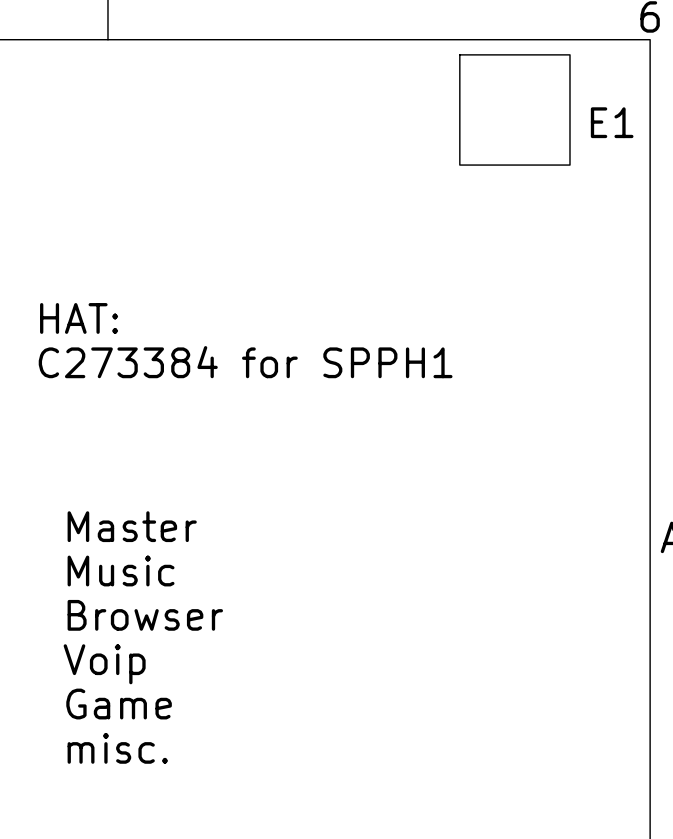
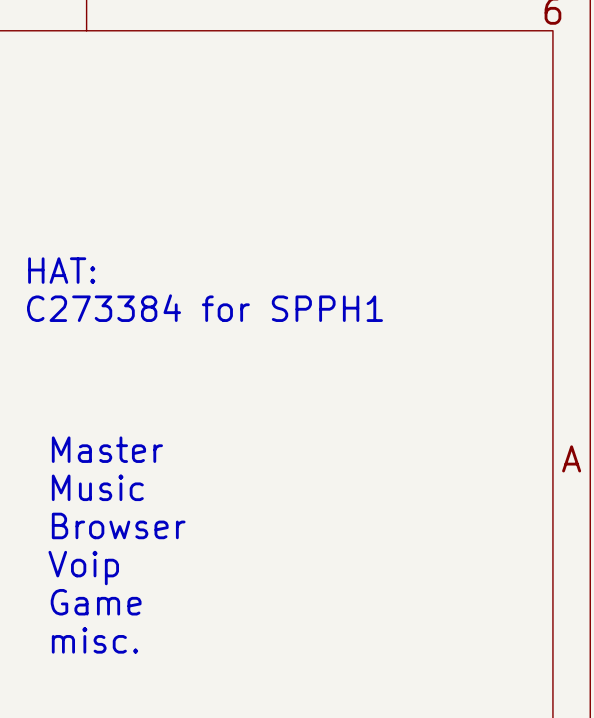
E1: (514, 109) -> none

